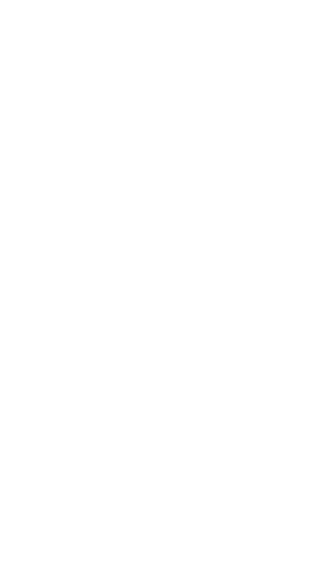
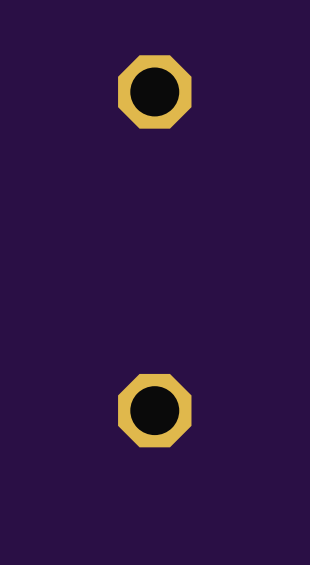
part: none -> (154, 91)
part: none -> (154, 410)

